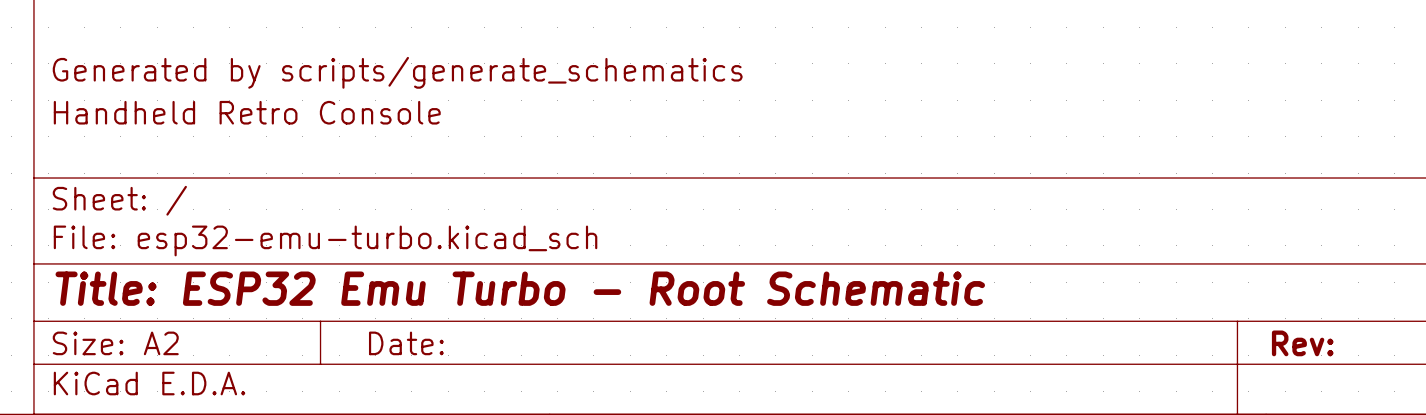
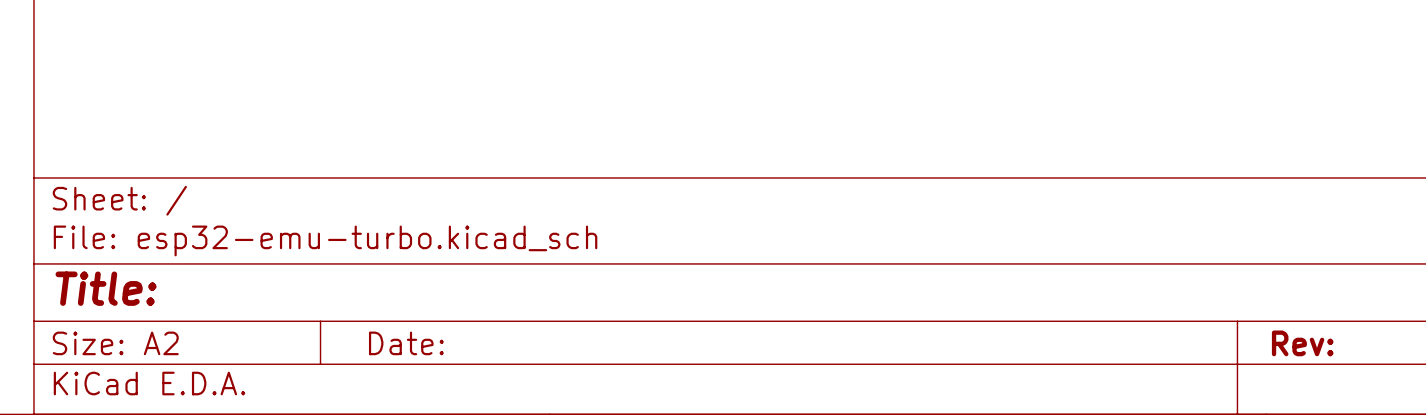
title block: Generated by scripts/generate_schematics (397, 72) -> none
title block: Handheld Retro Console (247, 112) -> none
title block: Title: ESP32 Emu Turbo - Root Schematic (520, 288) -> Title: (106, 288)

